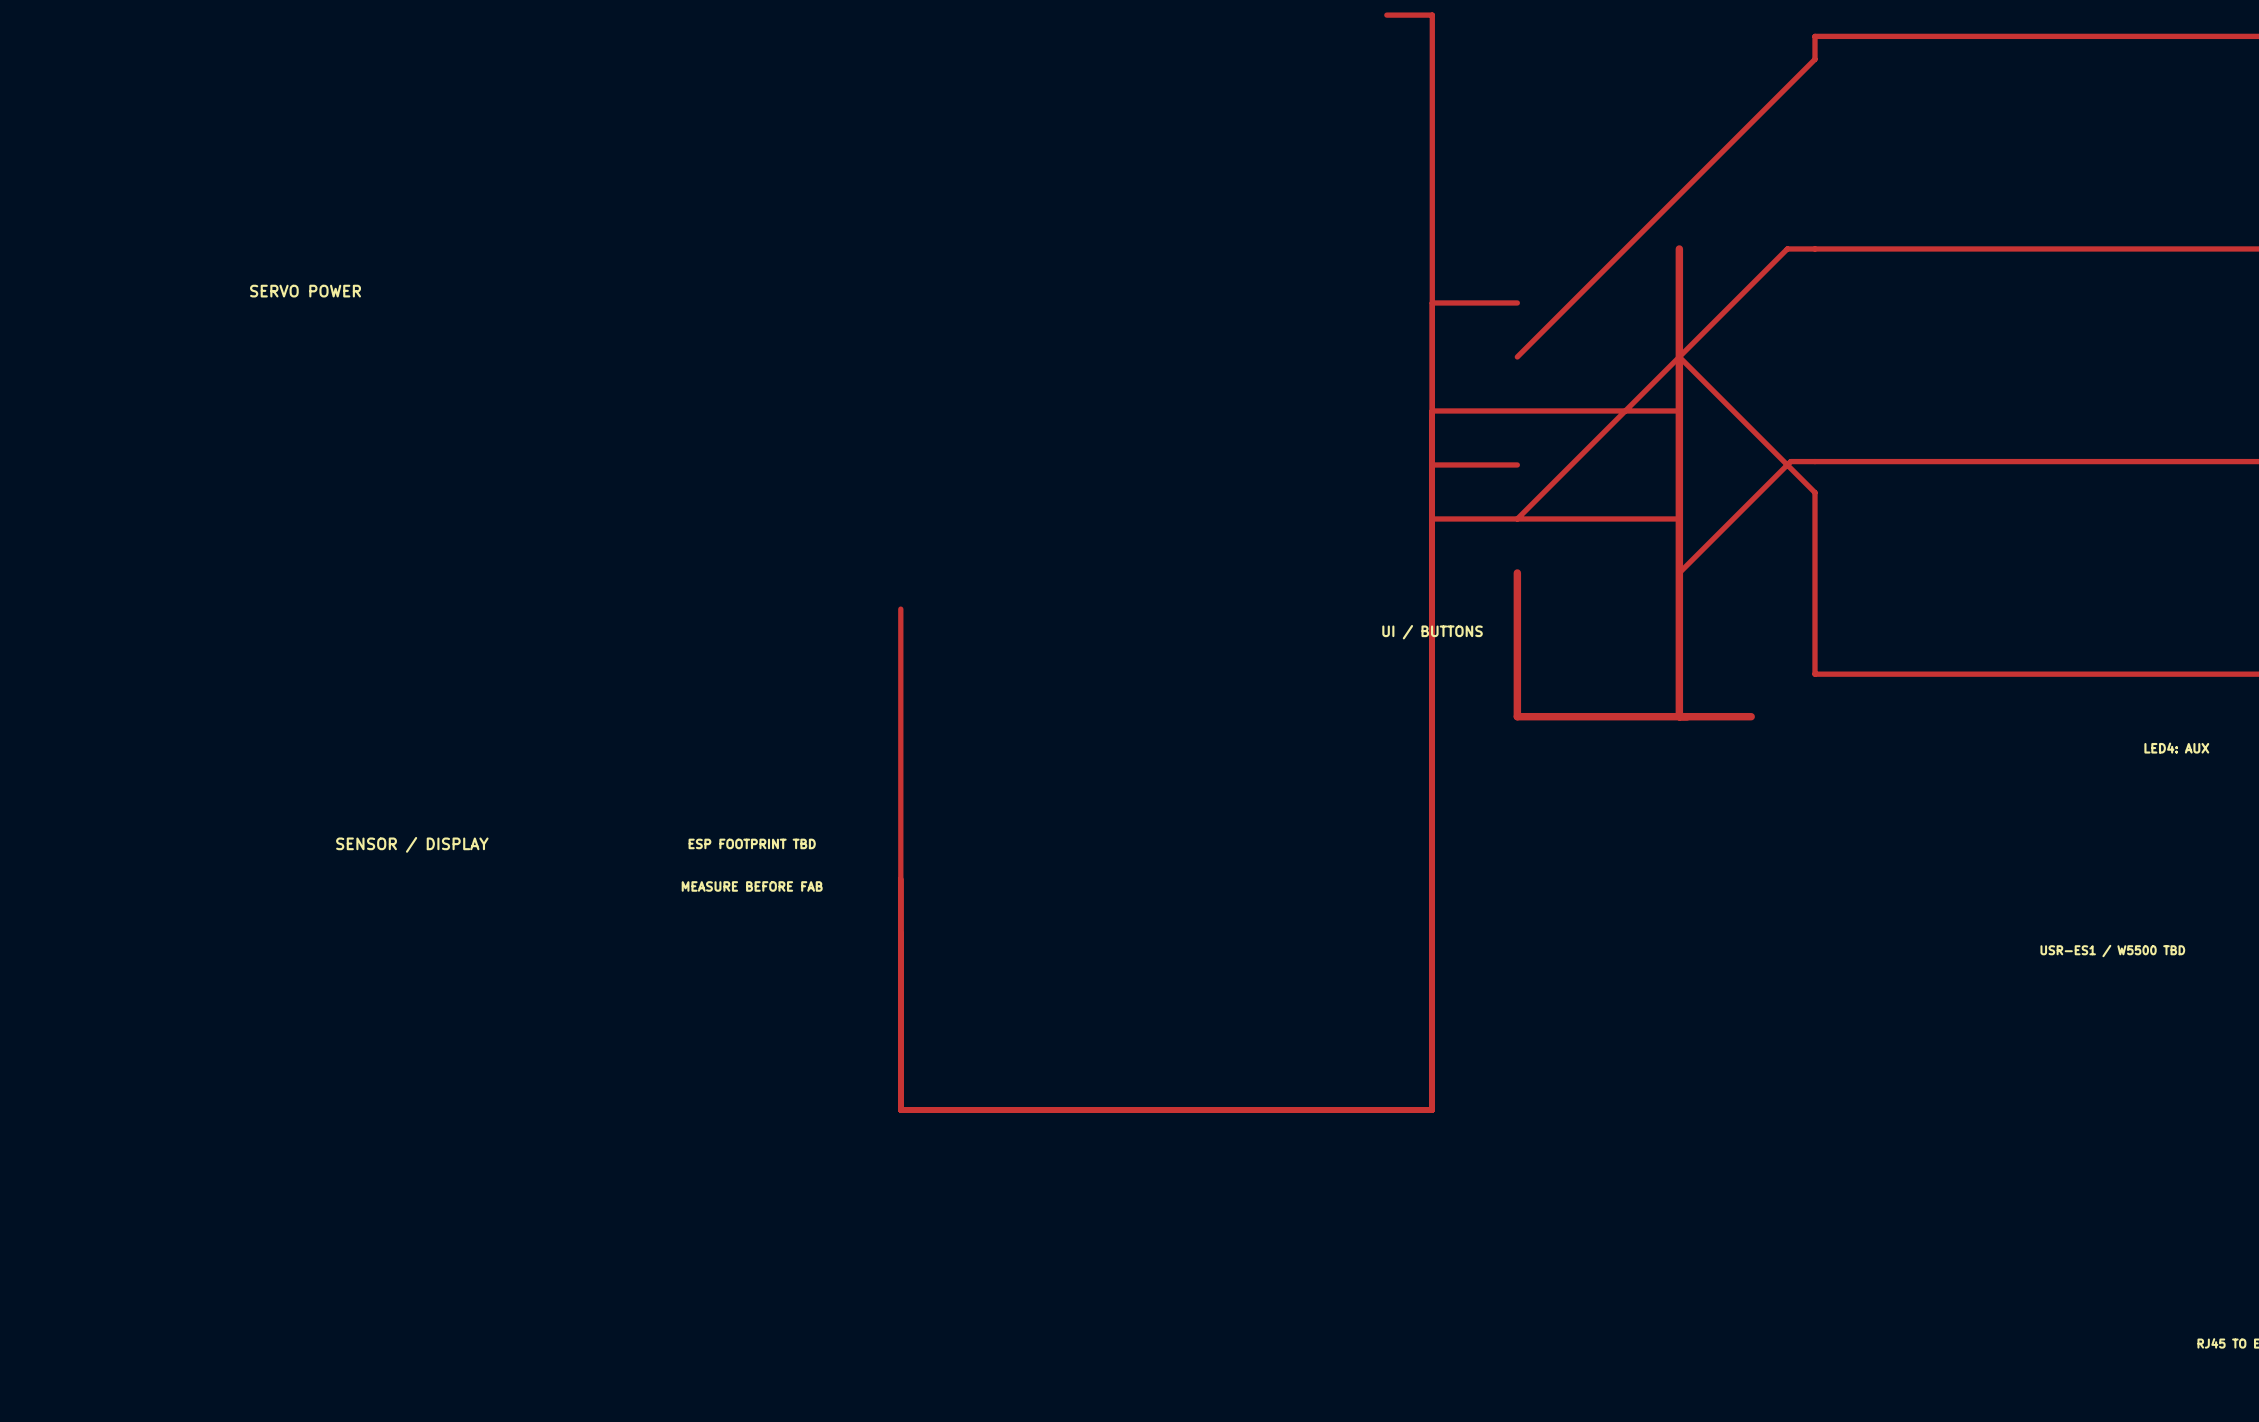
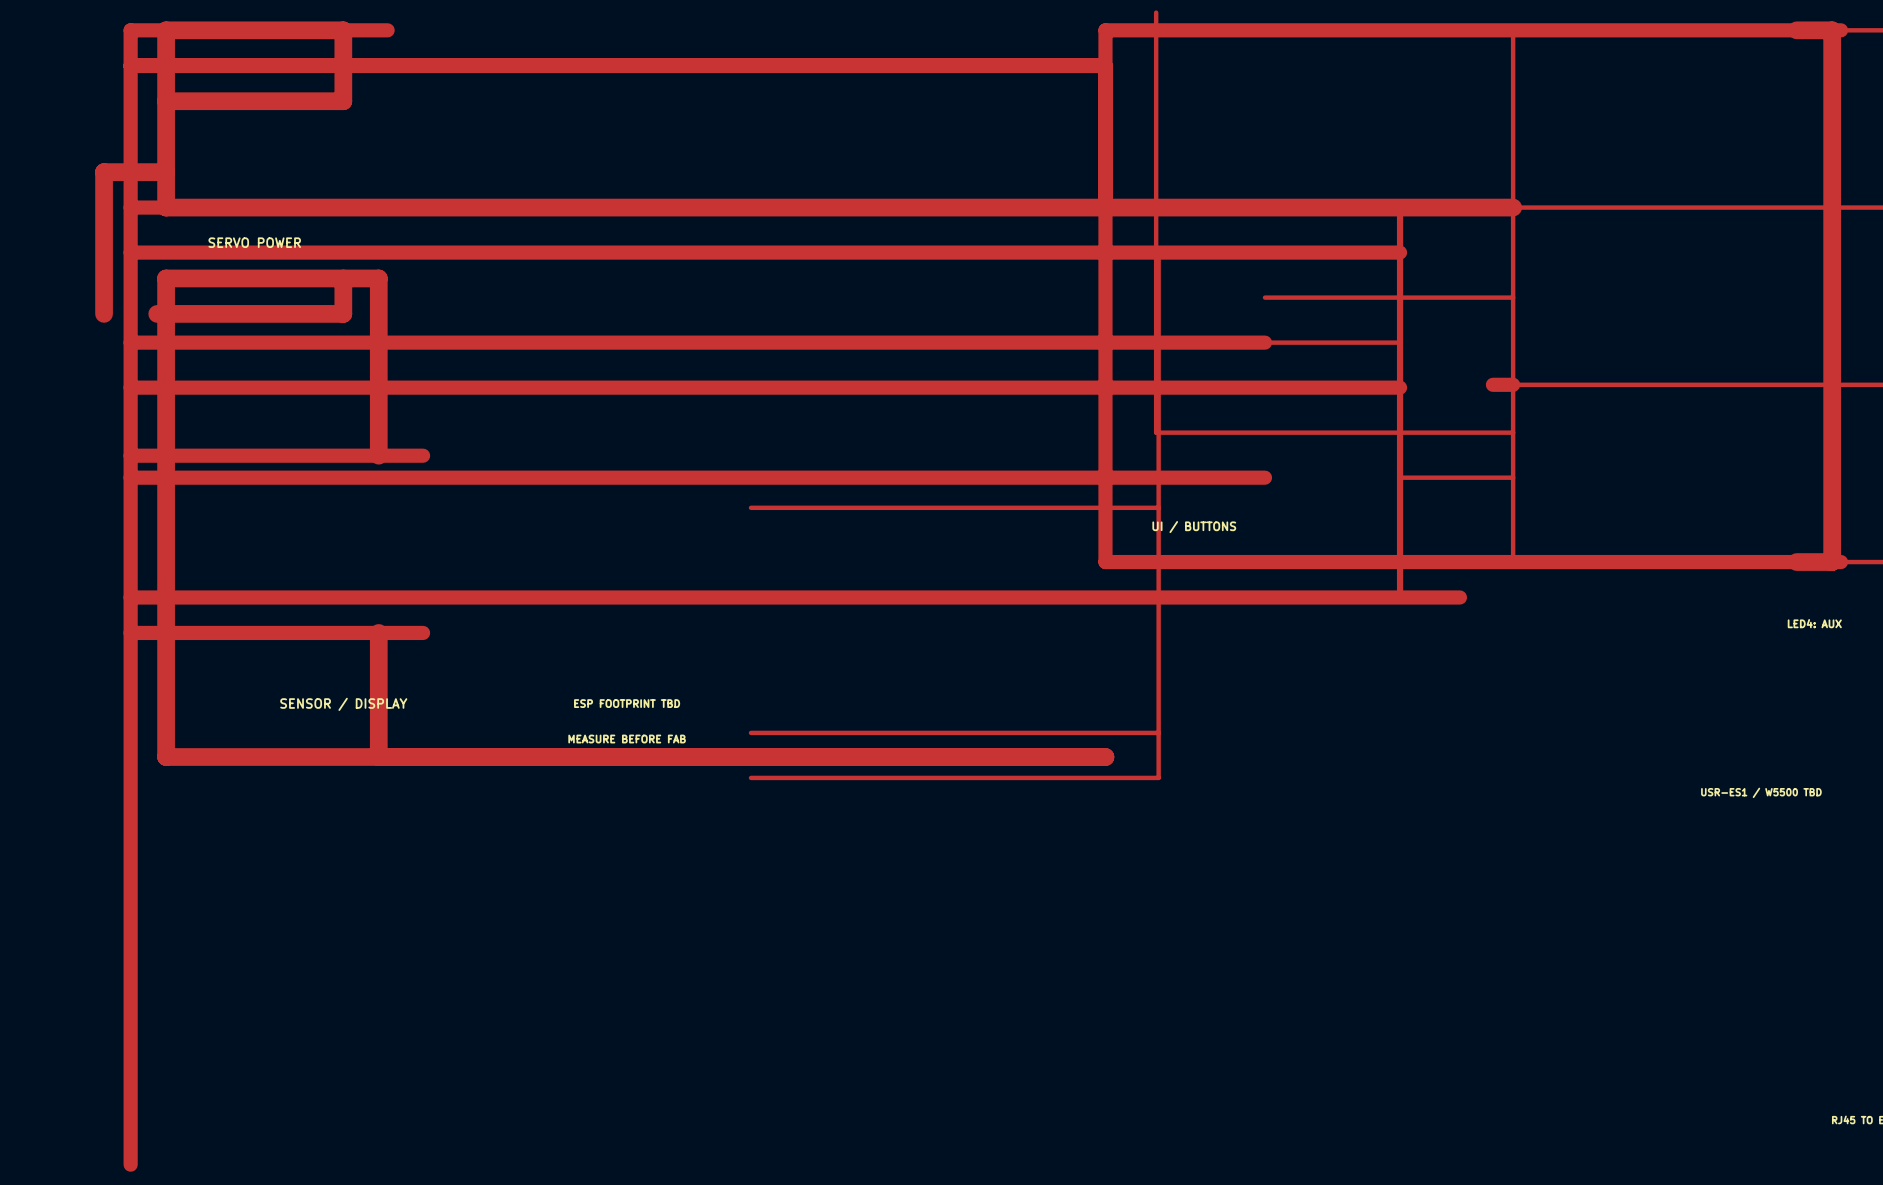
top track: (1386, 15) (1432, 15) (1432, 1110) (900, 1110) (900, 609) -> (1156, 12) (1156, 432) (1194, 432)
top track: none -> (387, 30) (130, 30) (130, 1164)
top track: none -> (1796, 30) (1832, 30) (1832, 562) (1796, 562)
top track: none -> (1841, 30) (1105, 30) (1105, 562) (1841, 562)
top track: (1814, 59) (1517, 356) -> (1513, 297) (1264, 297)
top track: none -> (130, 65) (1105, 65)
top track: none -> (166, 101) (343, 101) (343, 30) (166, 30) (166, 207) (1490, 207) (130, 207)
top track: none -> (166, 172) (104, 172) (104, 313)
top track: (1787, 248) (1517, 518) -> none
top track width: thin (1787, 248) (1814, 248) -> thick (1490, 207) (1513, 207)
top track: none -> (130, 252) (1400, 252)
top track: none -> (1194, 252) (1158, 252) (1158, 777) (750, 777)
top track: none -> (343, 278) (343, 313) (157, 313)
top track: (1679, 356) (1814, 492) -> (1513, 49) (1513, 410)
top track: none -> (130, 342) (1264, 342)
top track: (1790, 461) (1679, 572) -> (1513, 477) (1400, 477)
top track width: thin (1790, 461) (1814, 461) -> thick (1492, 384) (1513, 384)
top track: none -> (130, 387) (1400, 387)
top track: none -> (1400, 432) (1513, 432)
top track: none -> (130, 455) (423, 455)
top track: none -> (378, 455) (378, 278) (166, 278) (166, 757) (1105, 757)
top track: (1517, 572) (1517, 716) -> (1264, 477) (130, 477)
top track: none -> (750, 507) (1158, 507)
top track: none -> (130, 597) (1264, 597)
top track width: thin (1517, 716) (1751, 716) -> thick (1264, 597) (1459, 597)
top track: none -> (130, 632) (423, 632)
top track: none -> (378, 632) (378, 757)
top track: none -> (750, 732) (1158, 732)

